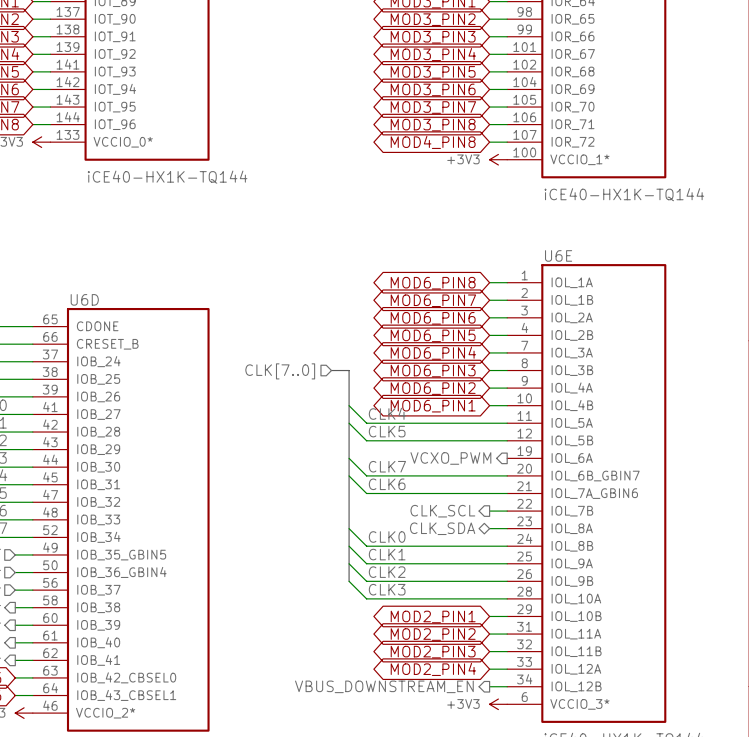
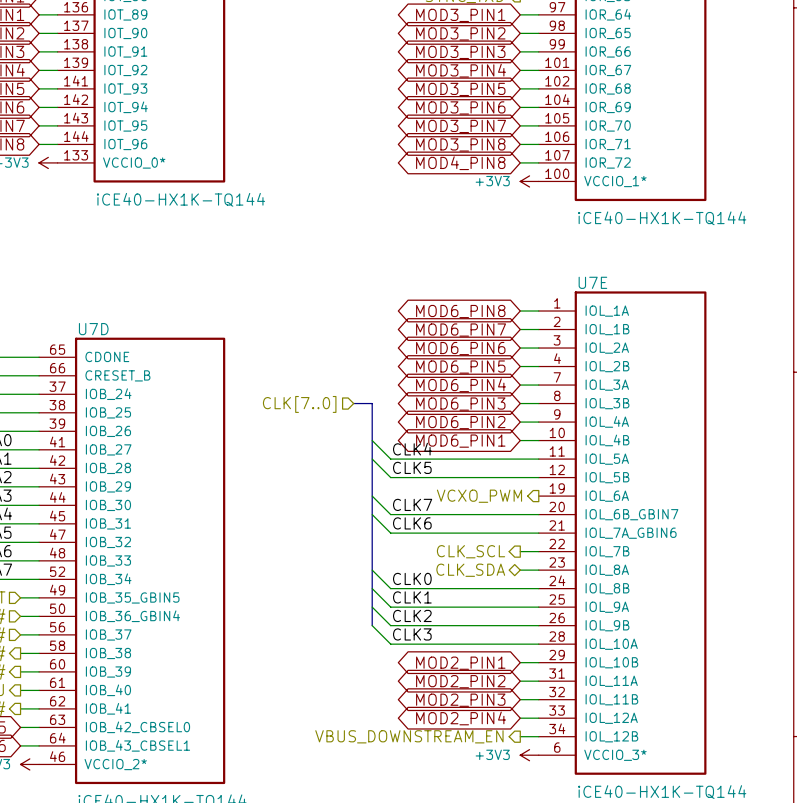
U6E name: U6E (558, 255) -> U7E (592, 282)
U6D name: U6D (84, 299) -> U7D (93, 329)

